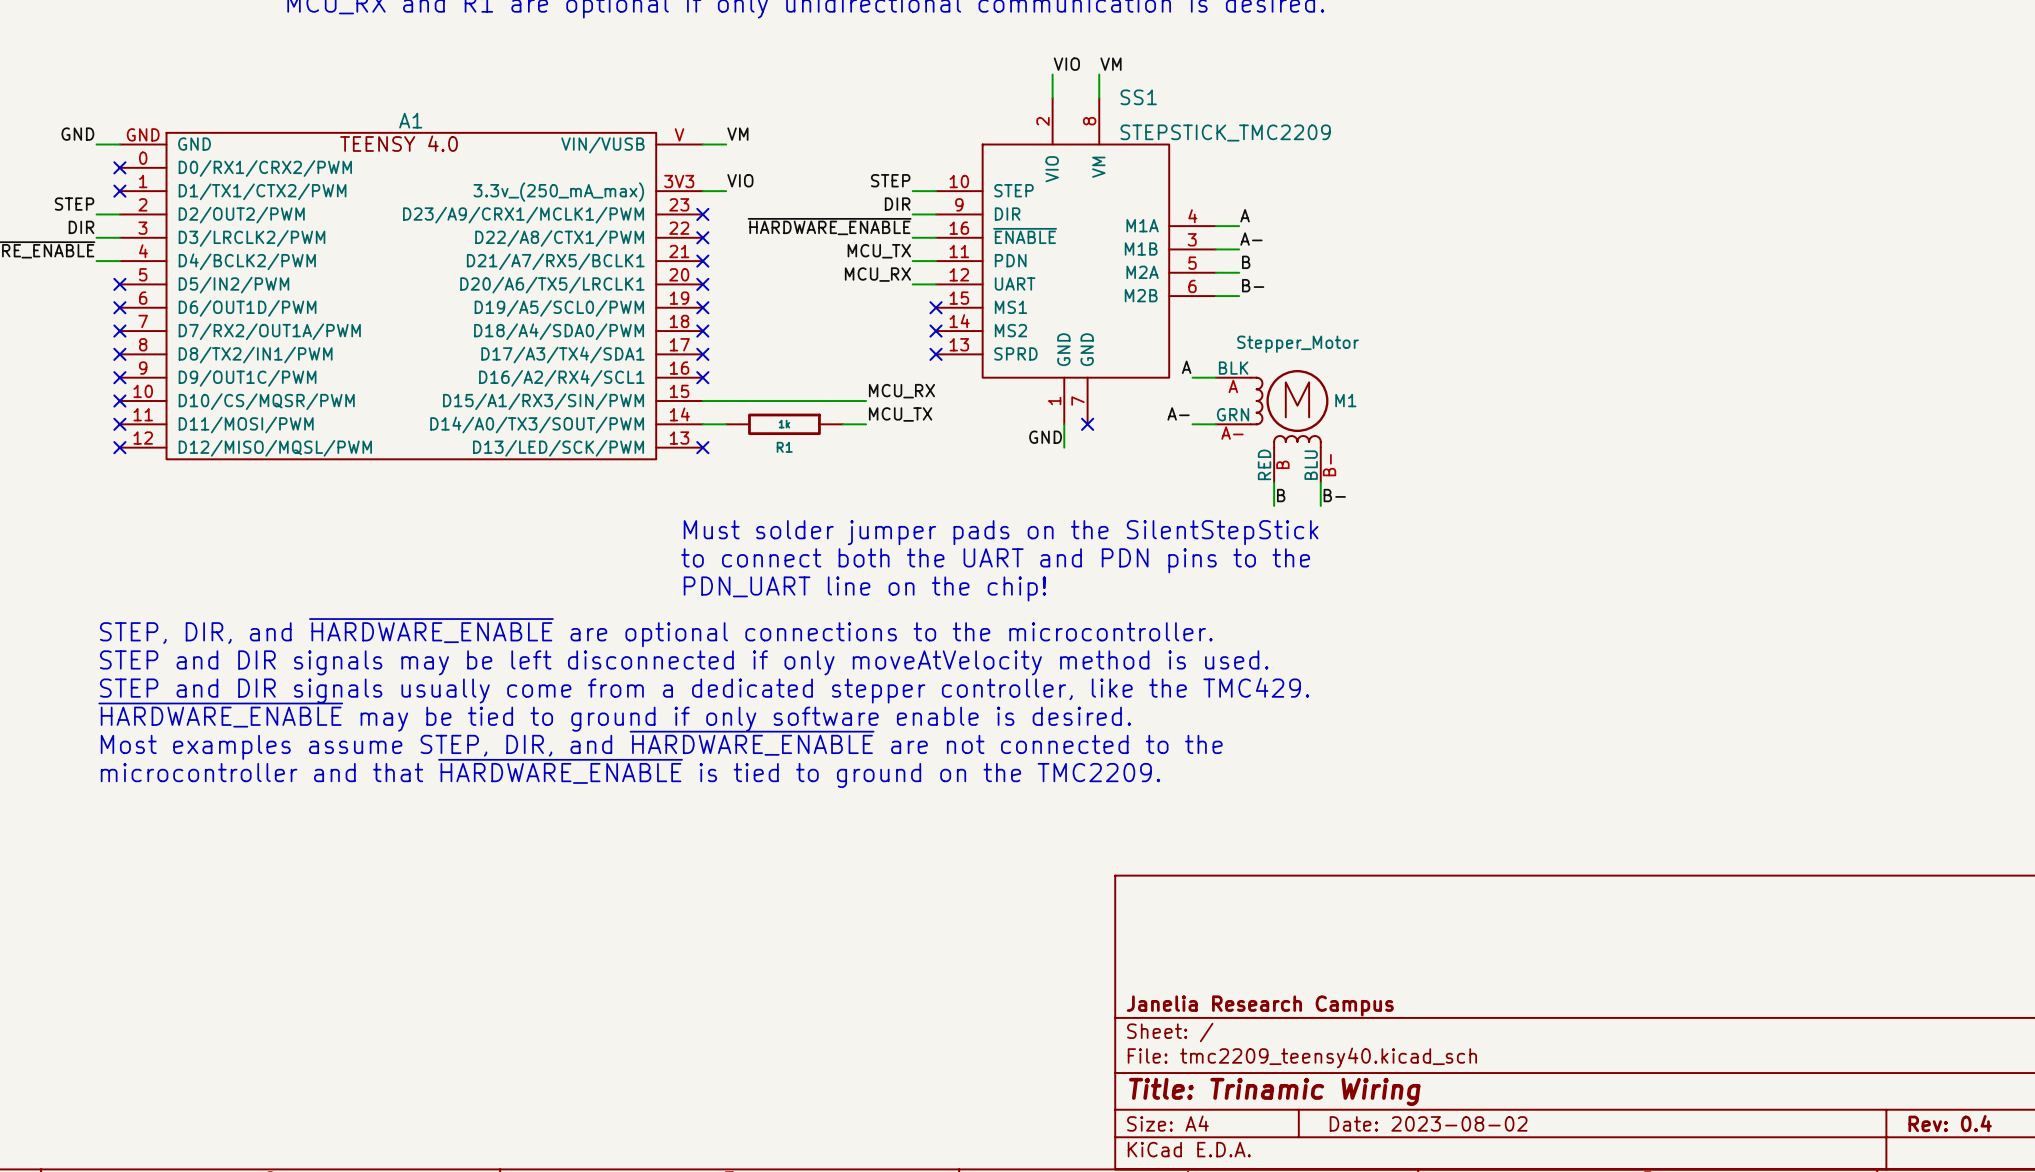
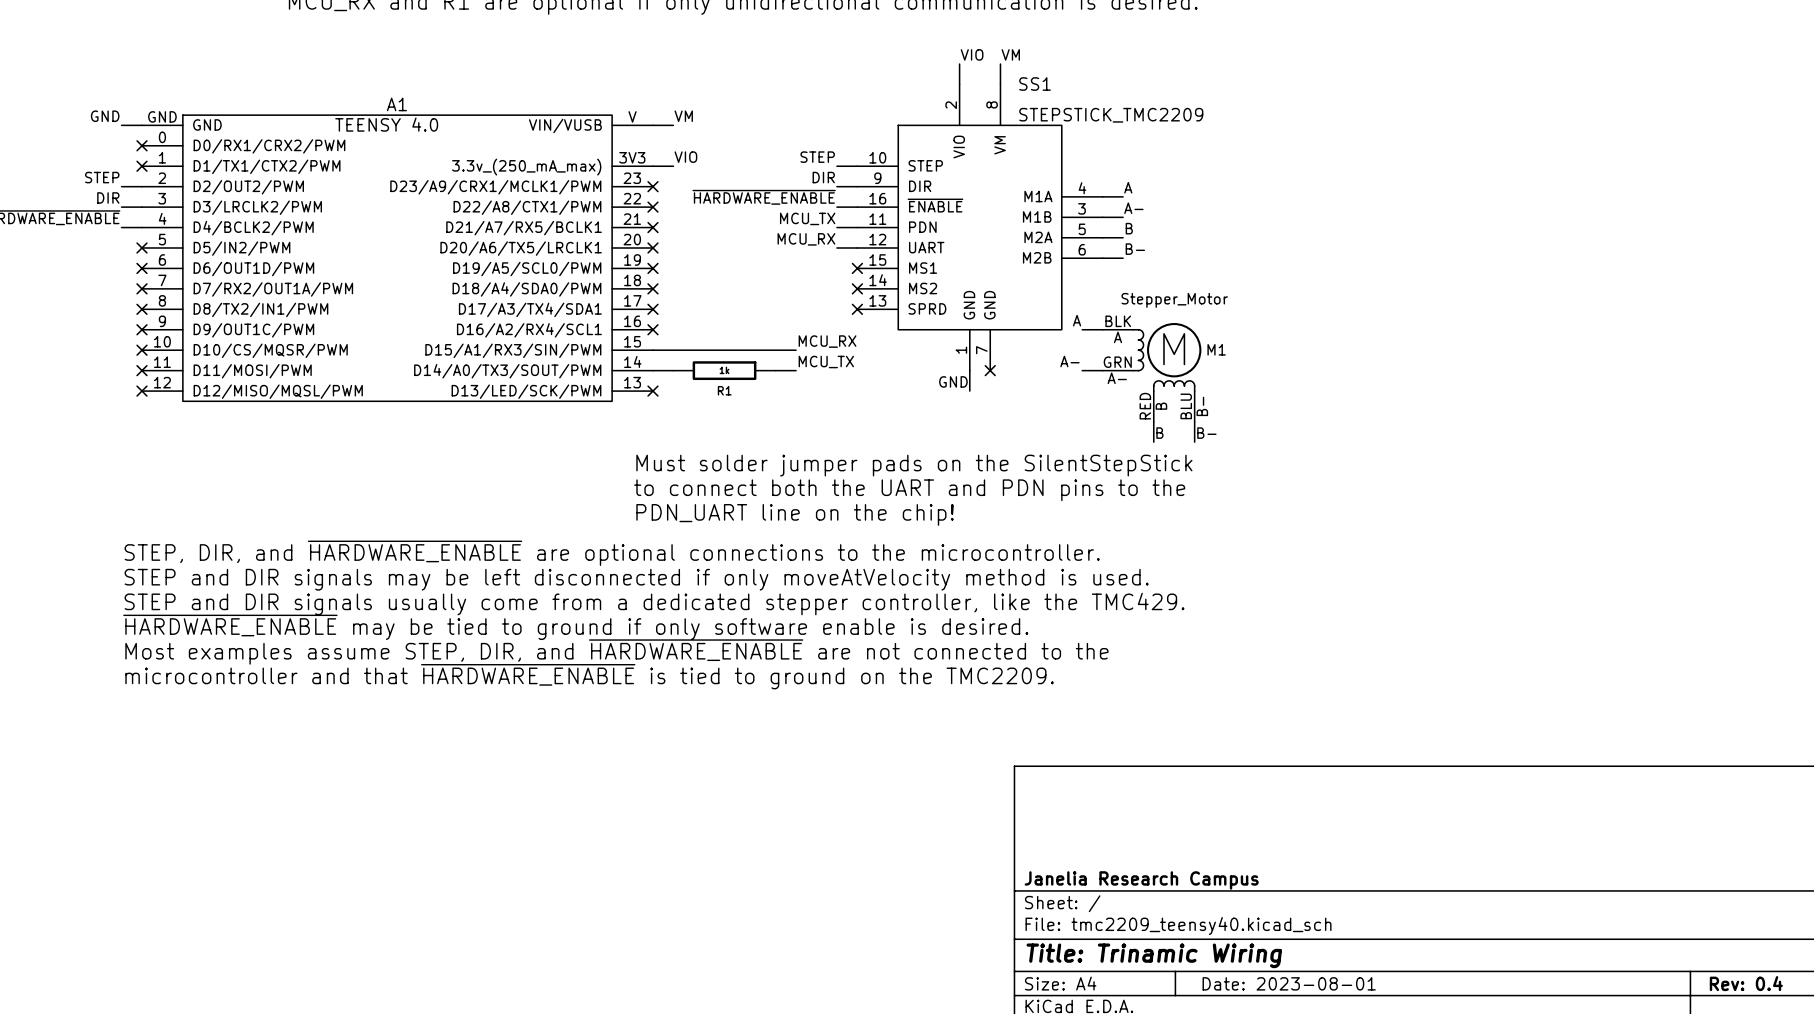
title block: Date: 2023-08-02 (1428, 1123) -> Date: 2023-08-01 (1289, 983)

